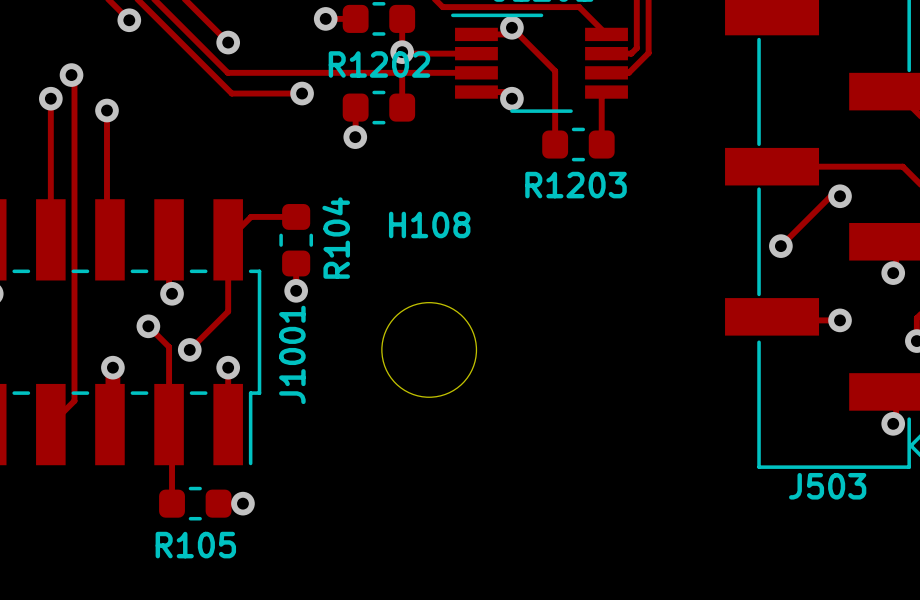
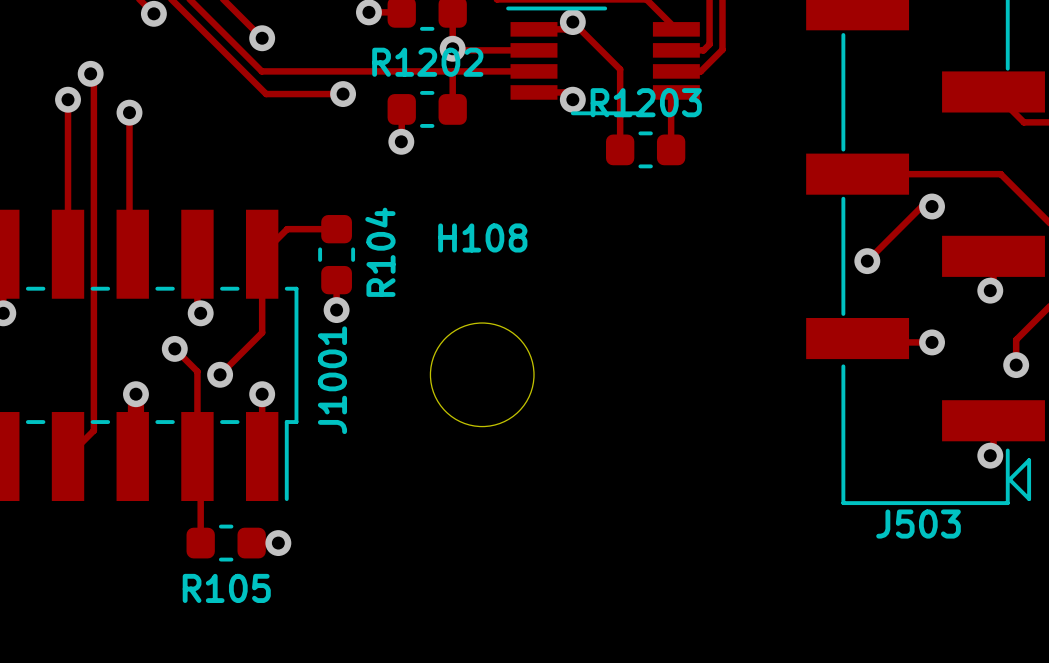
R1203 name position: R1203 (576, 185) -> R1203 (646, 102)

